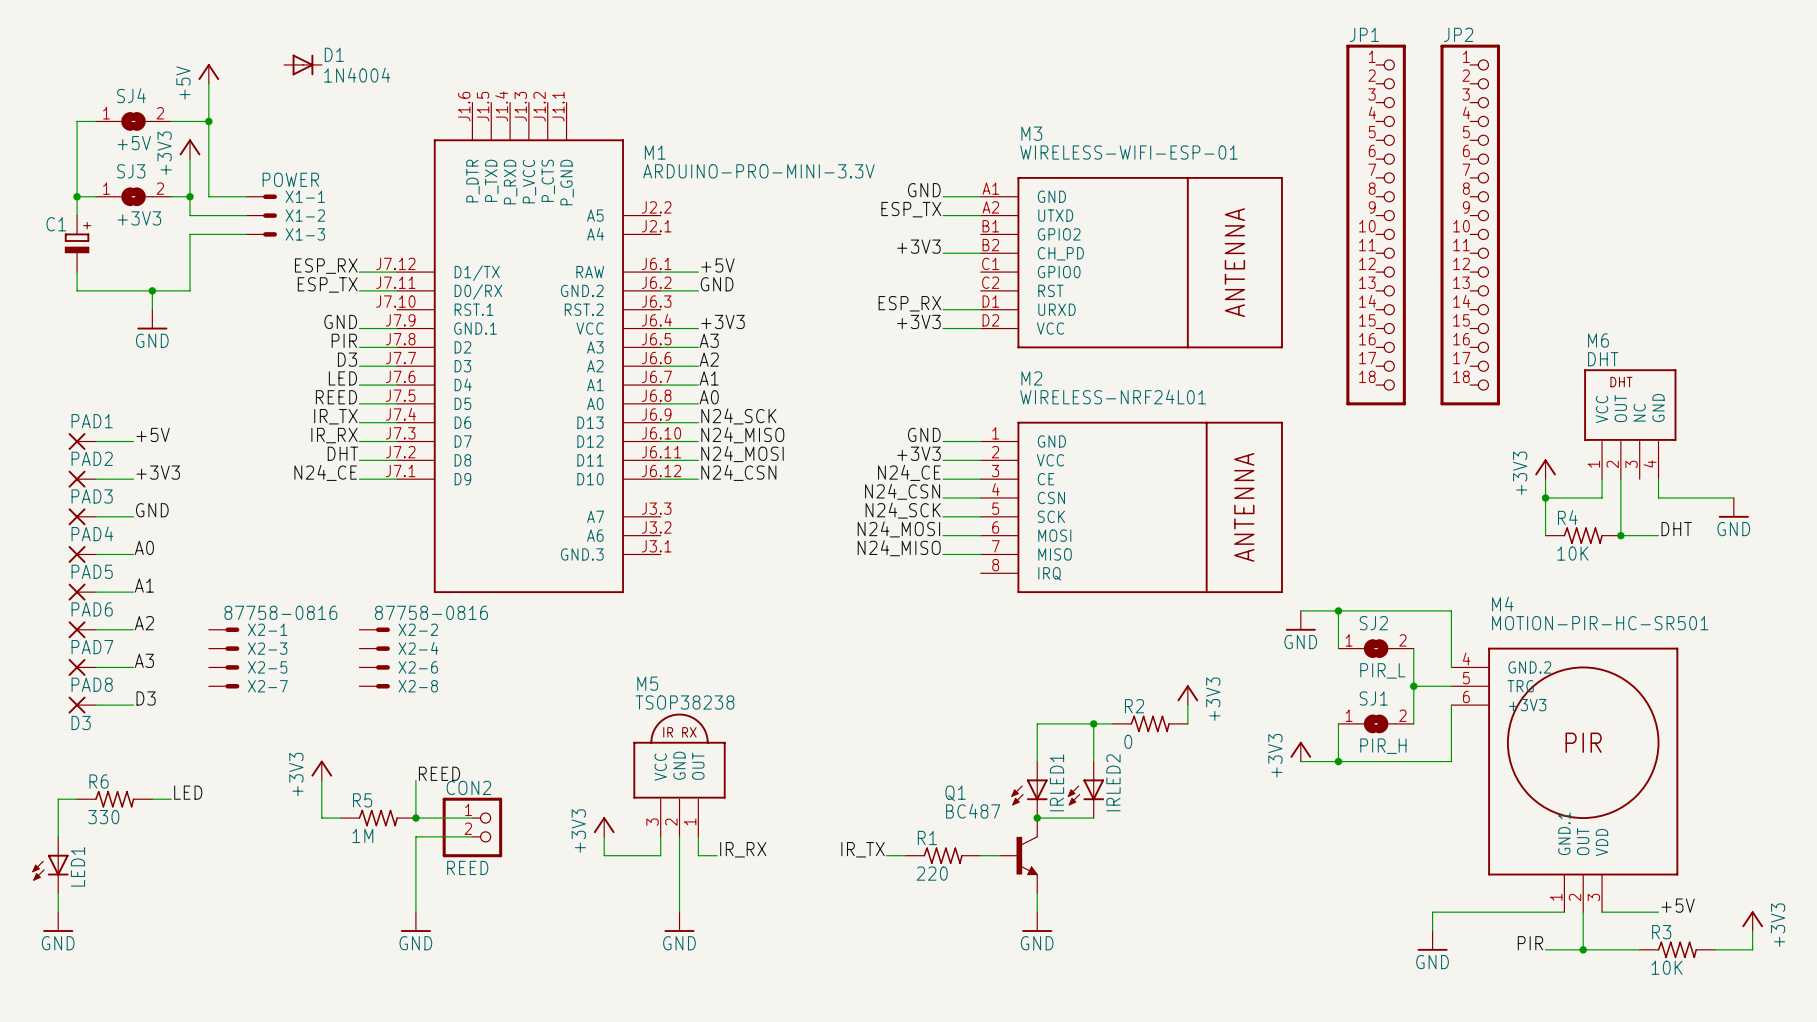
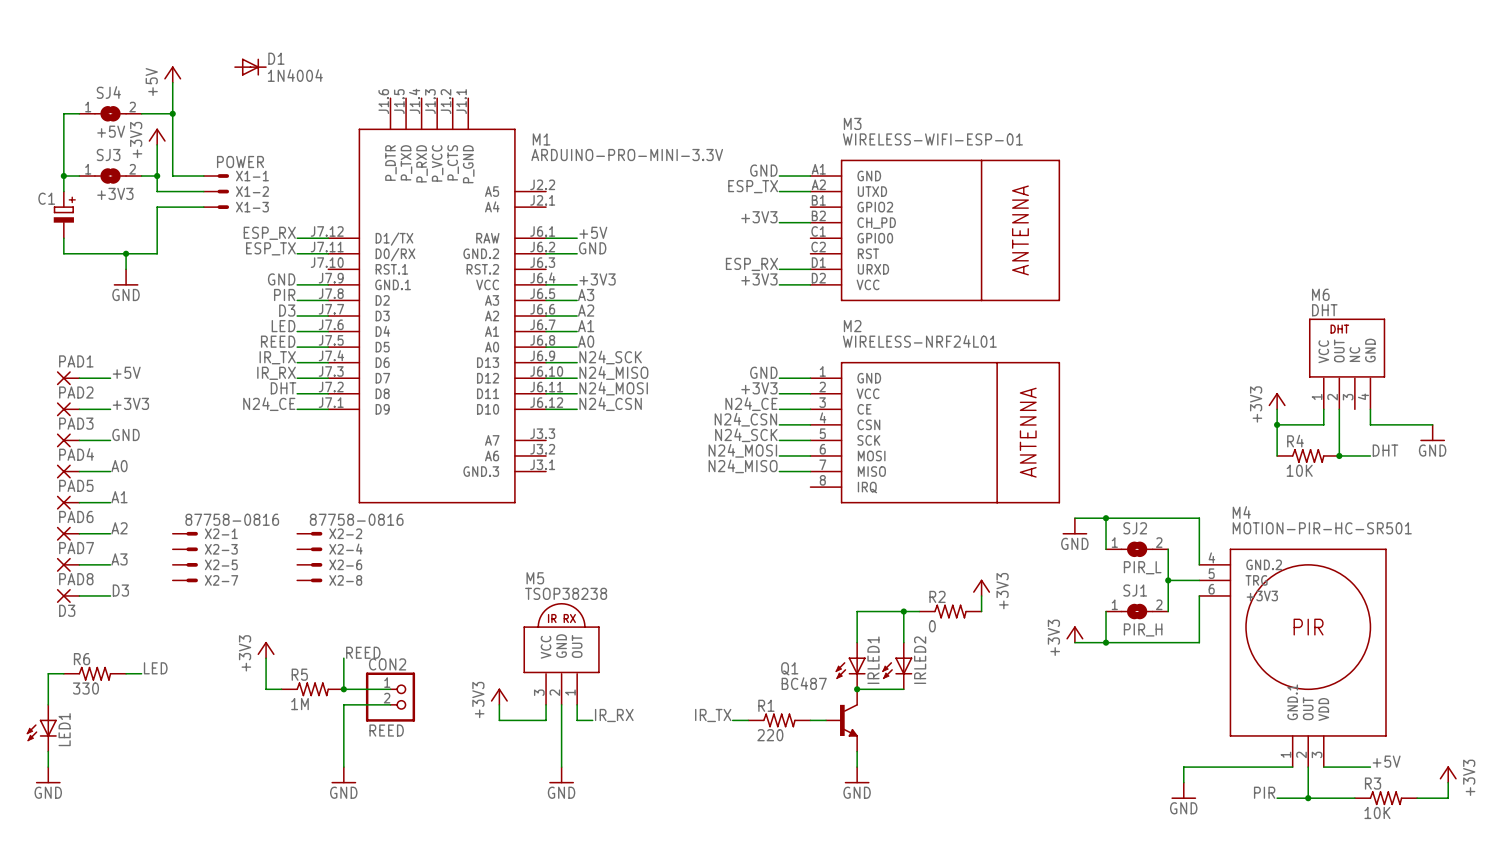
JP1: (1376, 225) -> none
JP2: (1470, 225) -> none

